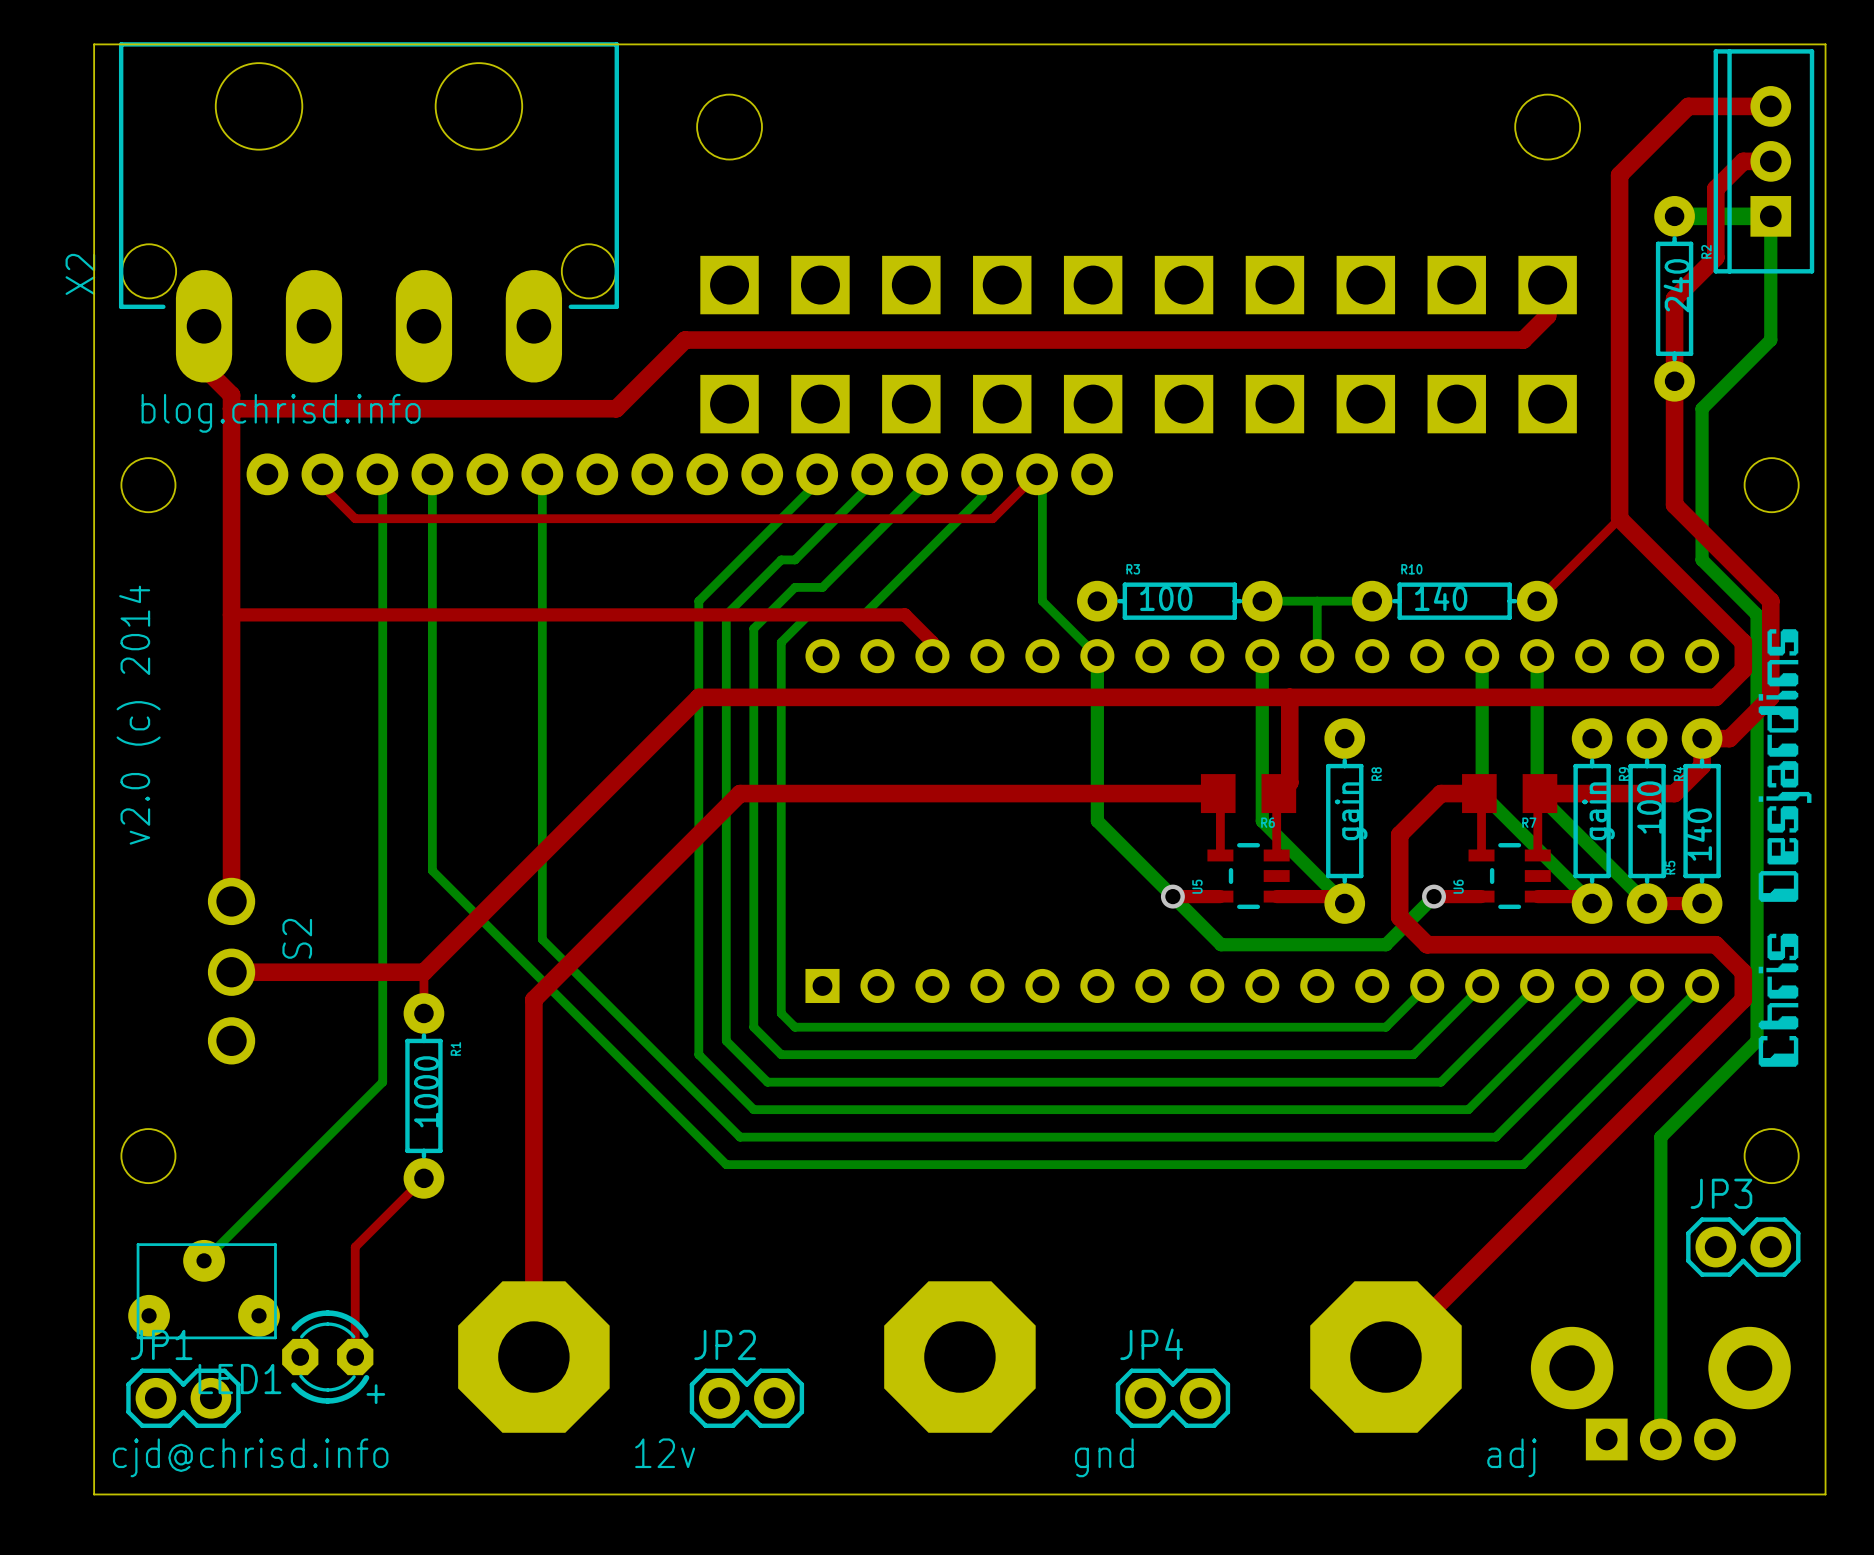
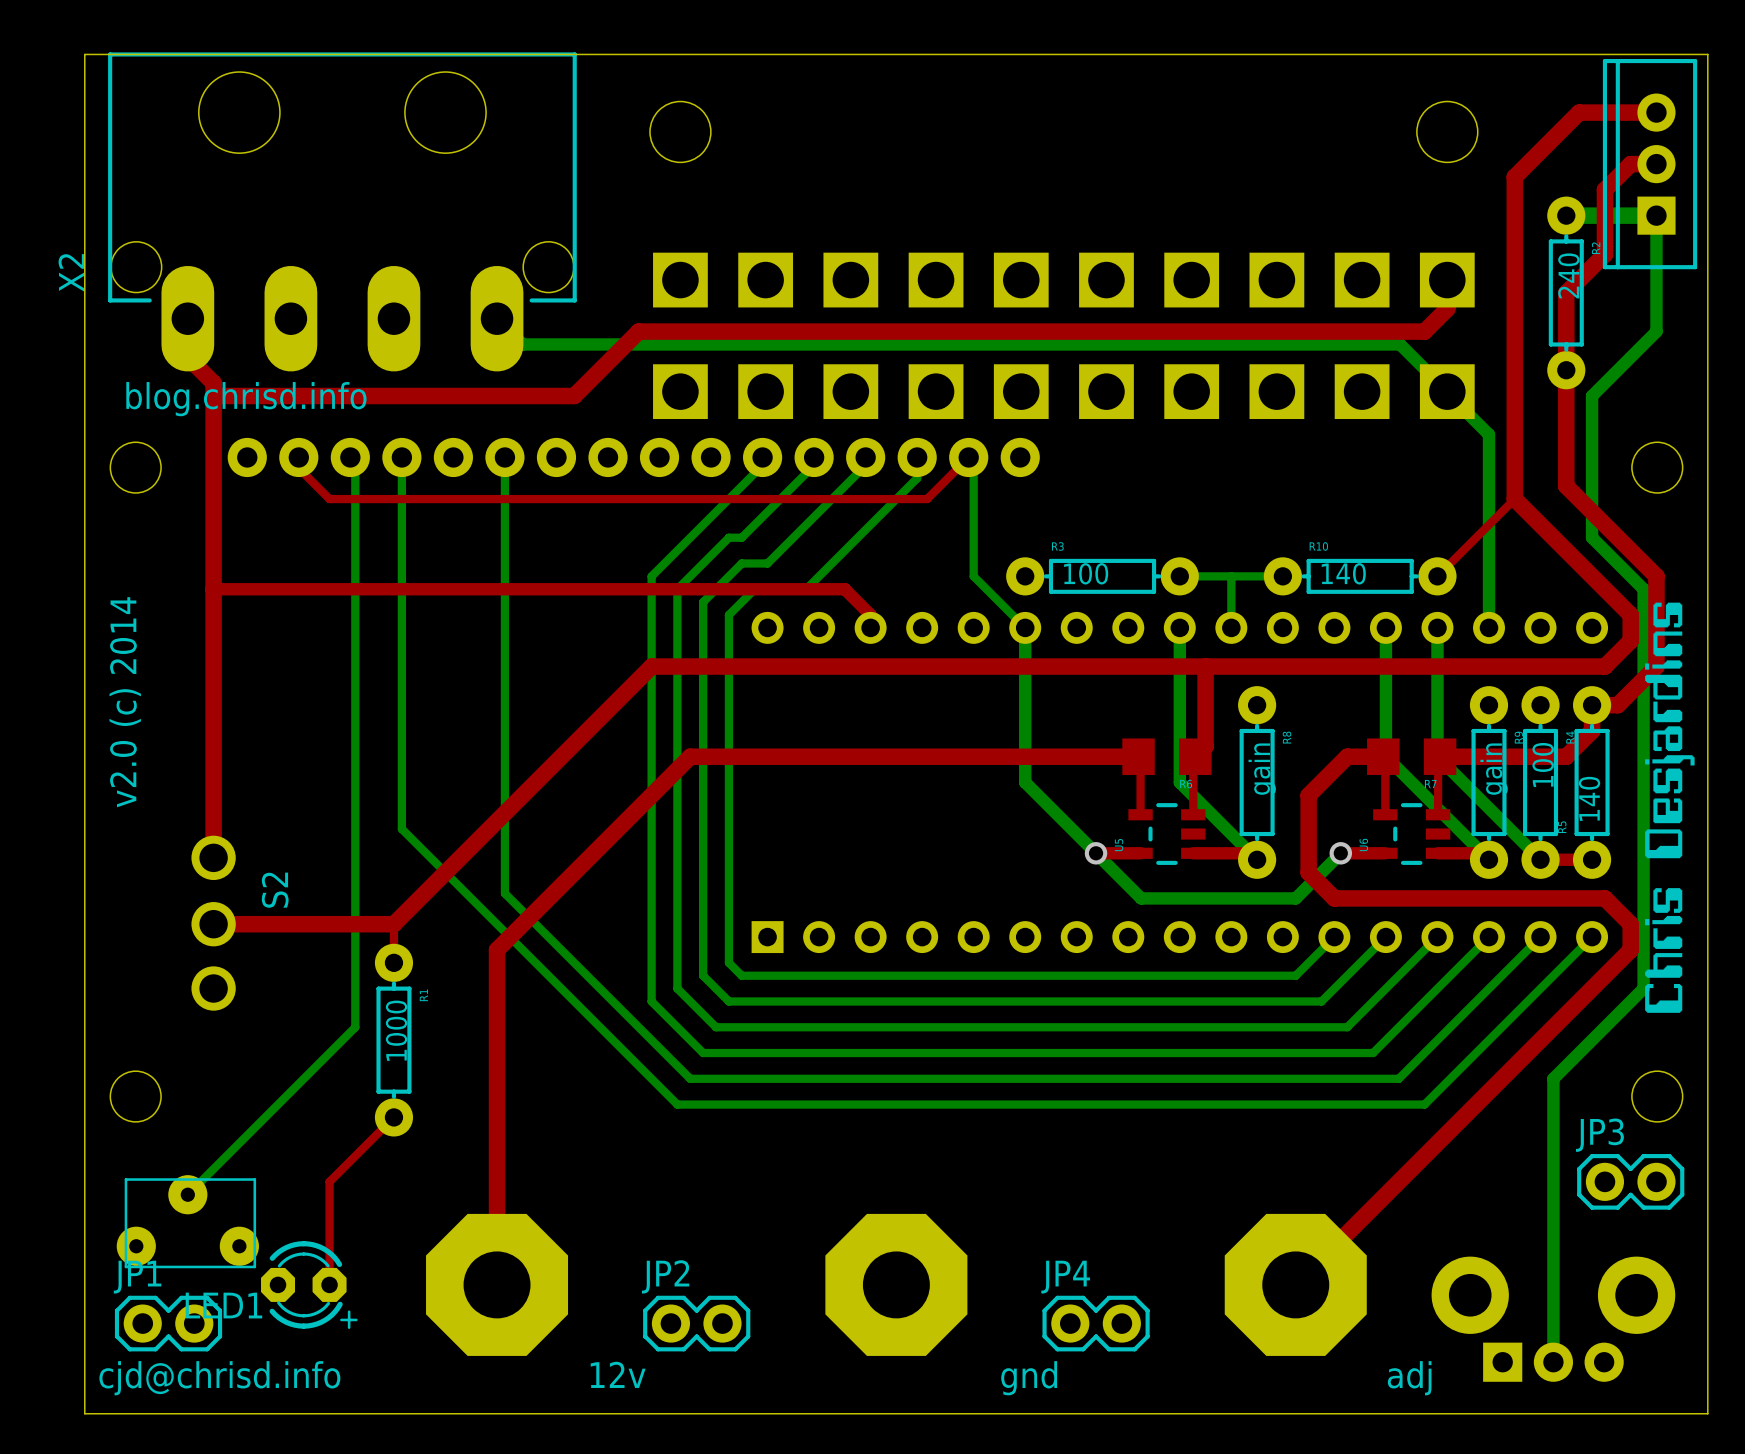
bottom track: none -> (497, 318) (522, 344) (1400, 344) (1489, 434) (1489, 627)

